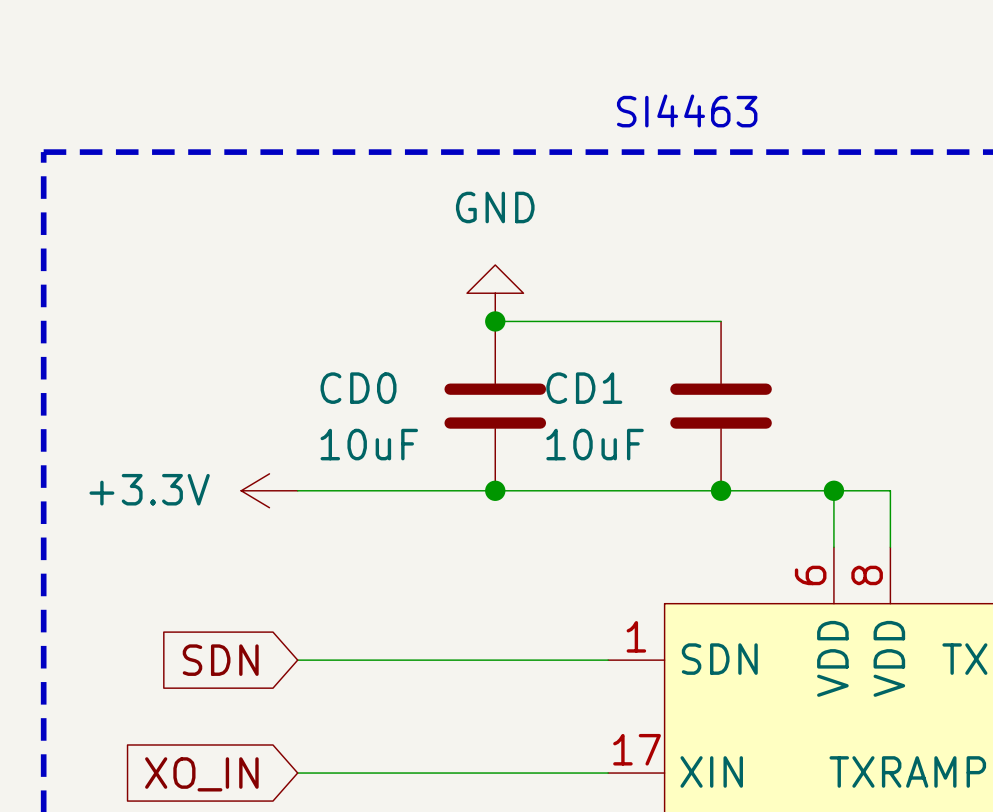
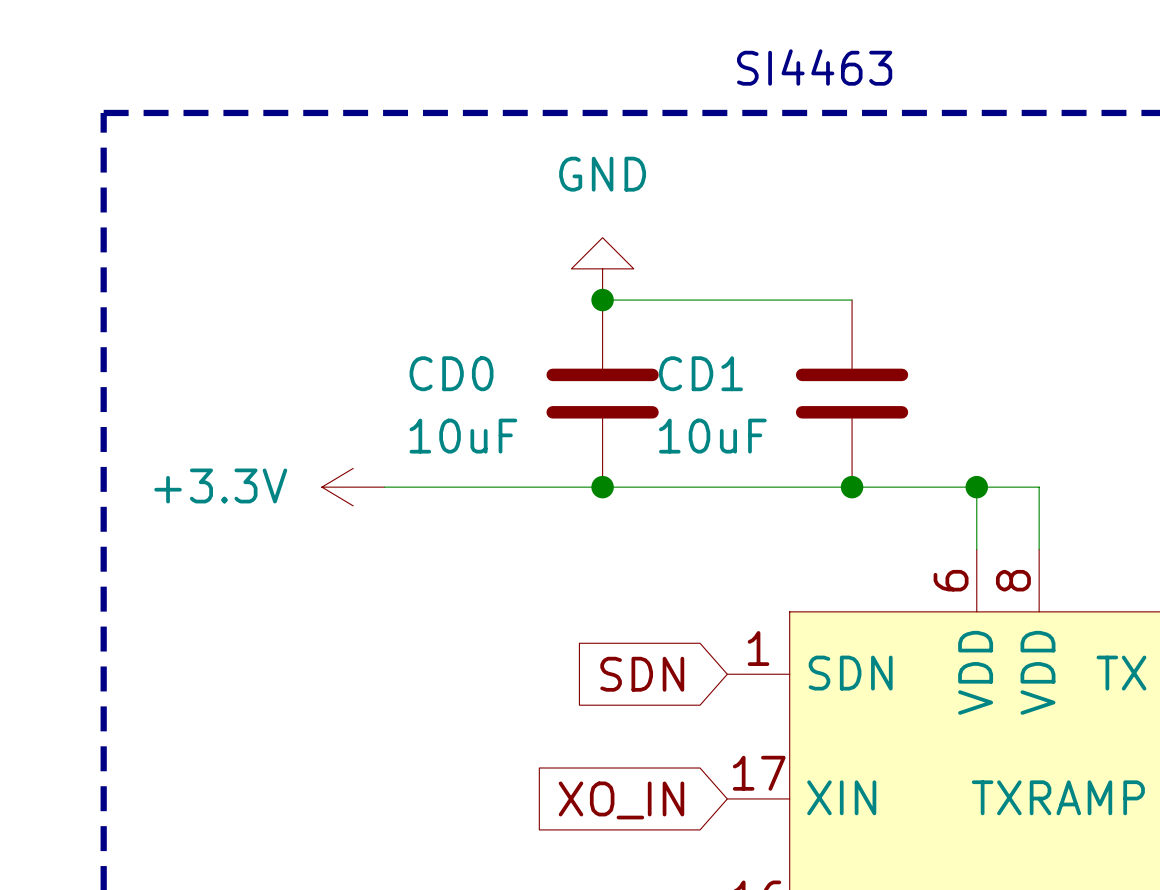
global label position: SDN (220, 660) -> SDN (642, 674)
wire: (297, 660) (608, 660) -> none
wire: (297, 773) (608, 773) -> none
global label position: XO_IN (201, 774) -> XO_IN (621, 800)

